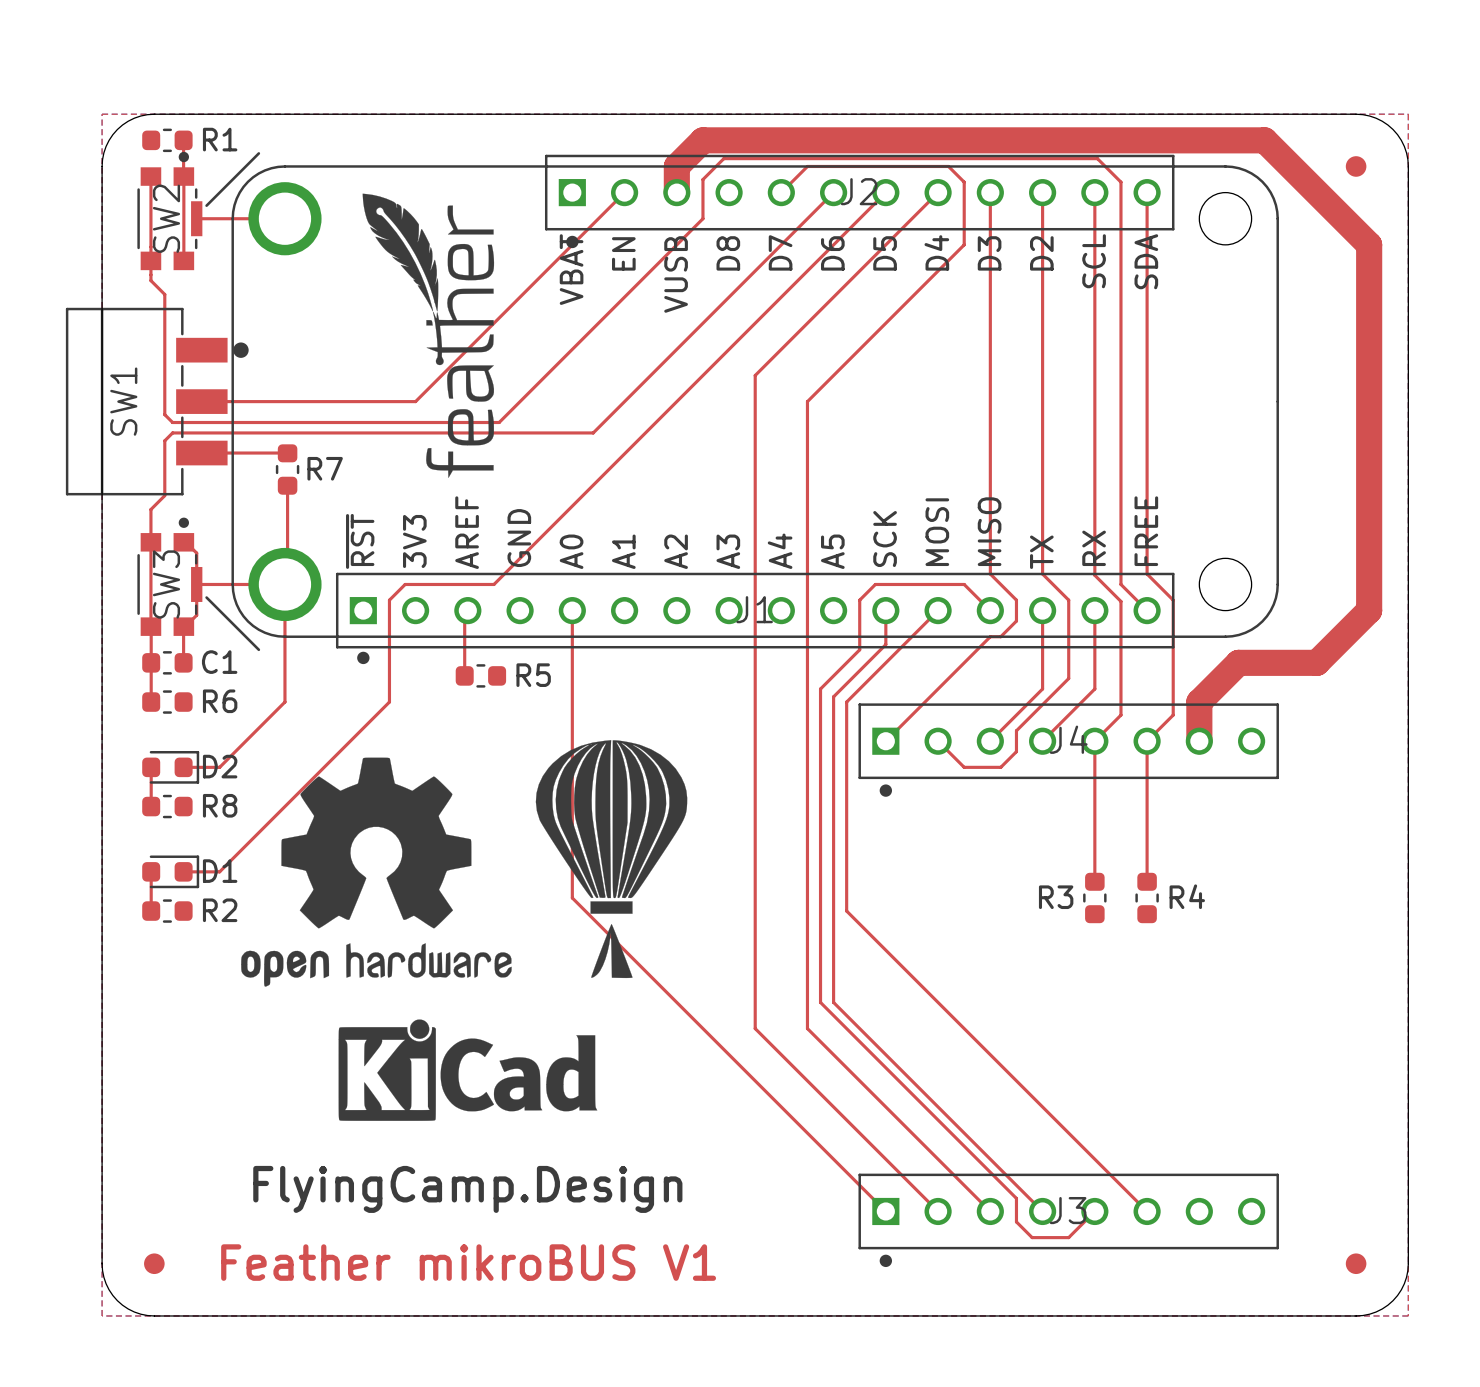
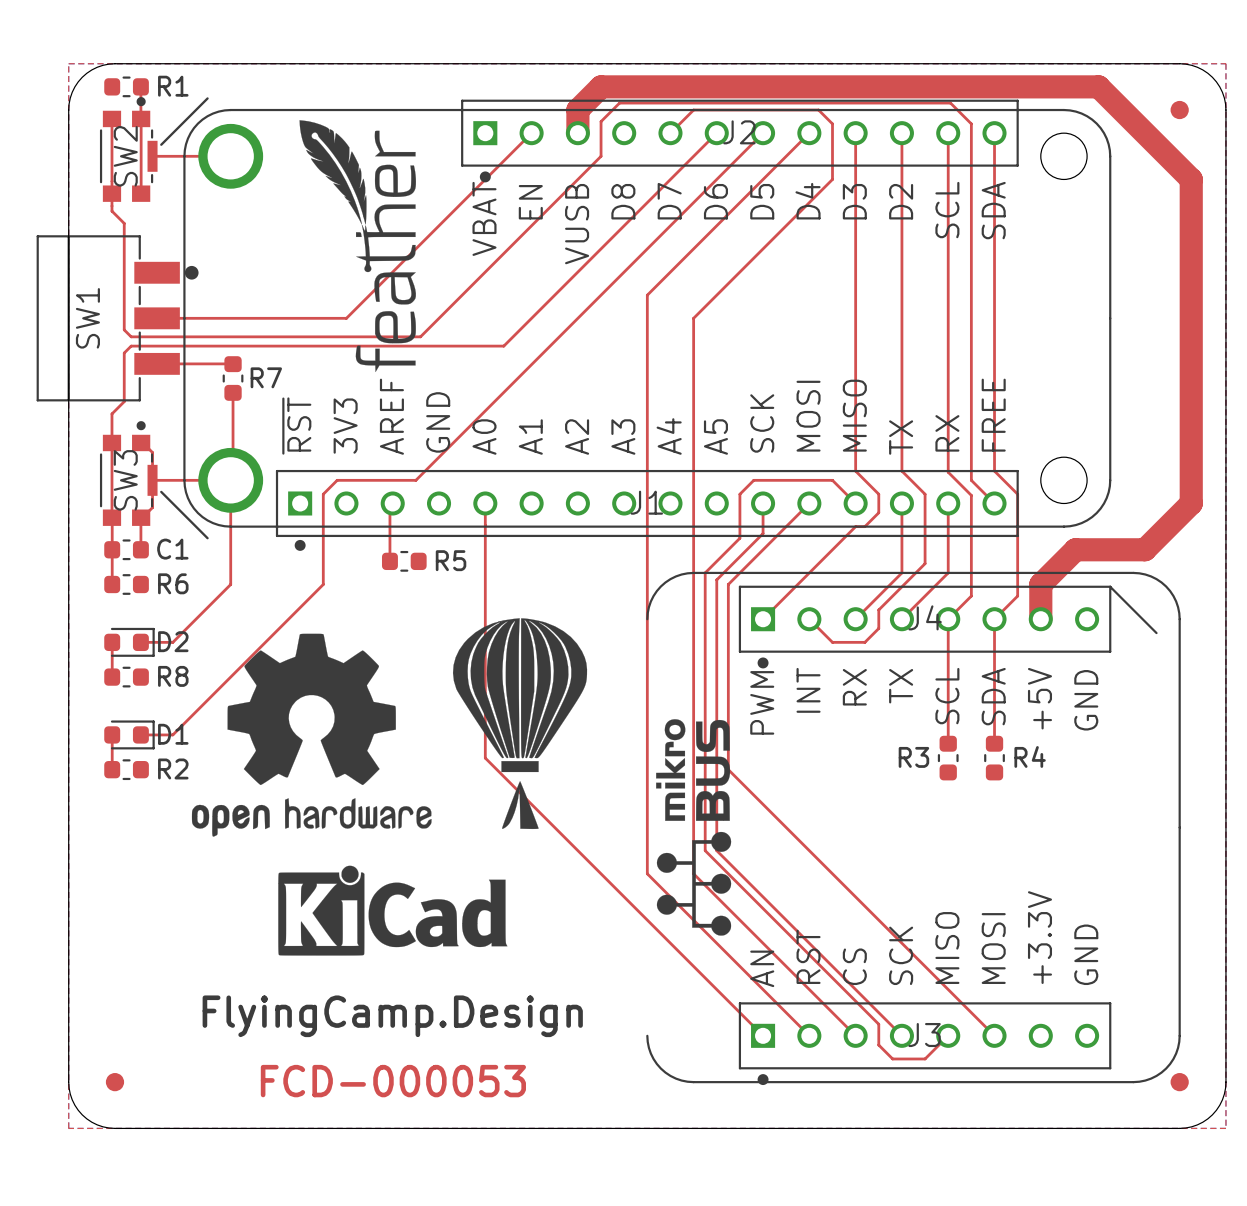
part footprint: [231, 165, 1279, 638] -> [183, 108, 1112, 528]
drawing: [362, 193, 495, 478] -> none
drawing: none -> [646, 571, 1181, 1084]
text: Feather mikroBUS V1 (468, 1262) -> FCD-000053 (393, 1081)

